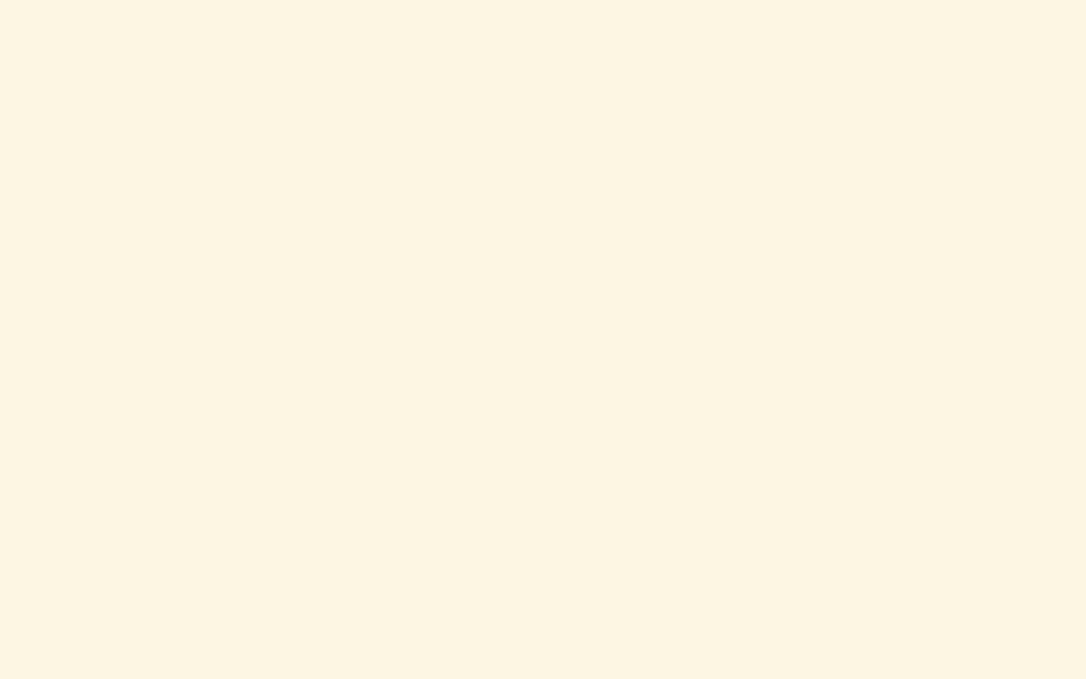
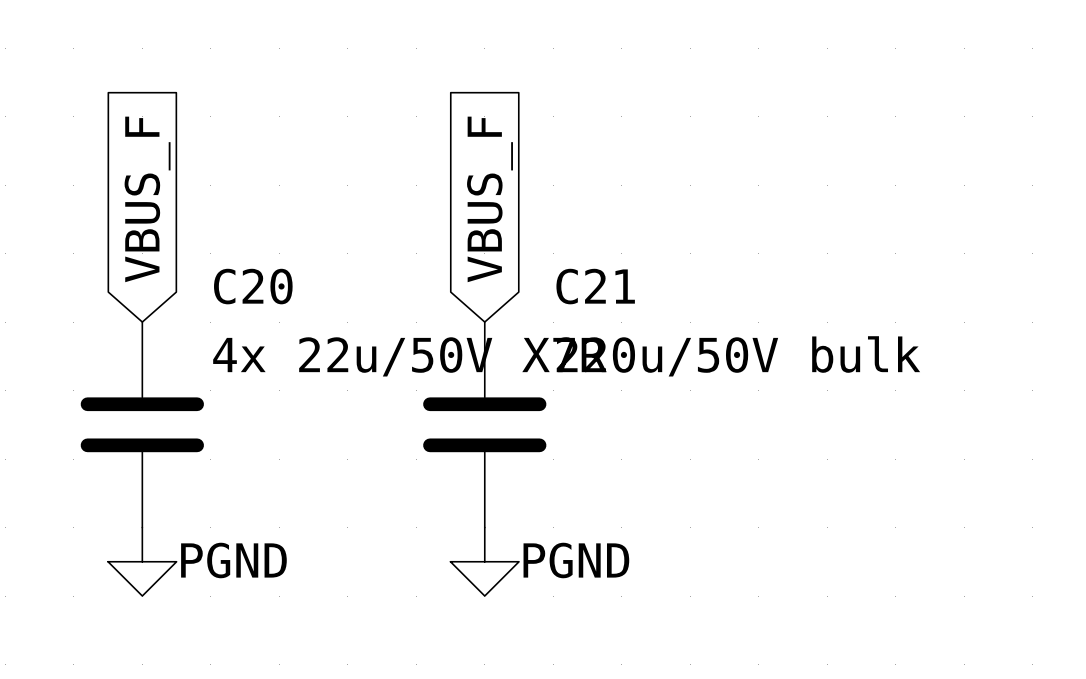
global label: none -> VBUS_F (147, 199)
global label: none -> VBUS_F (490, 199)
C20: none -> 4x 22u/50V X7R (142, 424)
C21: none -> 220u/50V bulk (484, 424)
power symbol: none -> PGND (142, 561)
power symbol: none -> PGND (484, 561)

